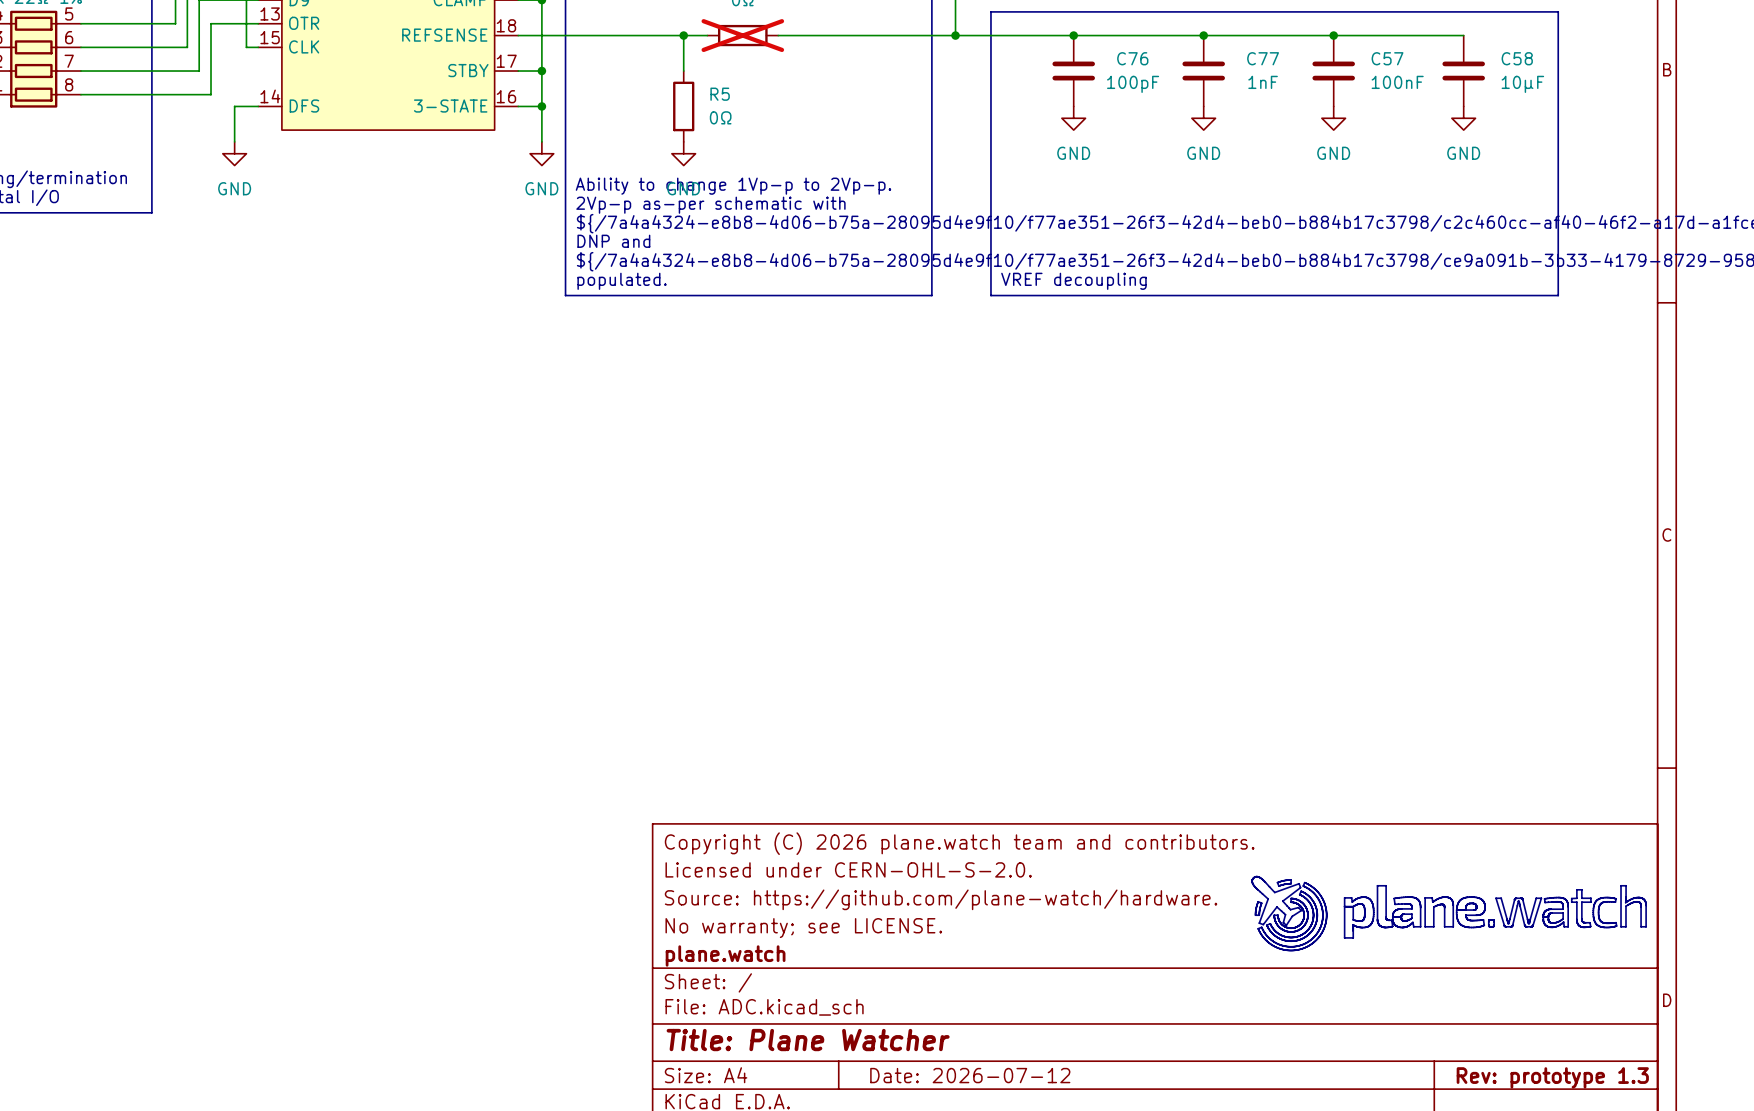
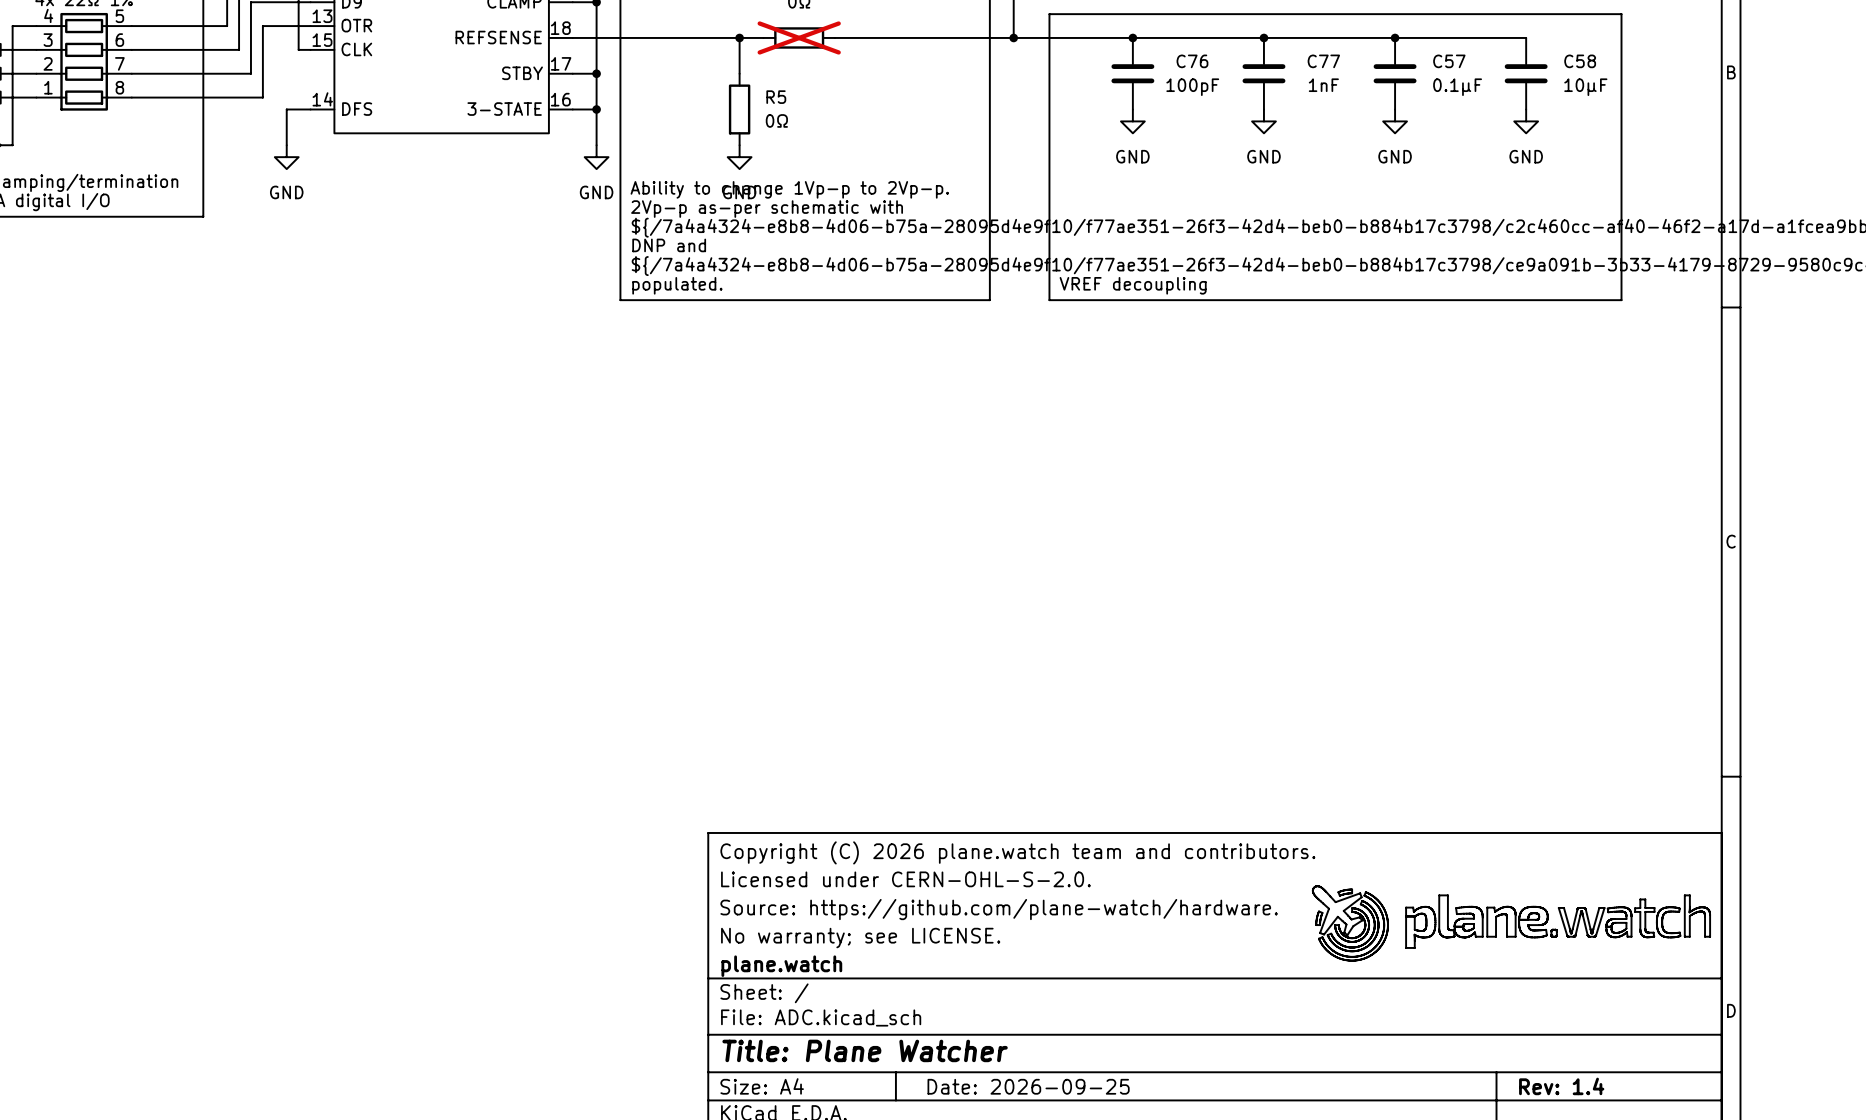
C57 value: 100nF (1397, 82) -> 0.1µF (1457, 87)
title block: Date: 2026-07-12 (970, 1075) -> Date: 2026-09-25 (1028, 1086)
title block: Rev: prototype 1.3 (1552, 1077) -> Rev: 1.4 (1561, 1086)

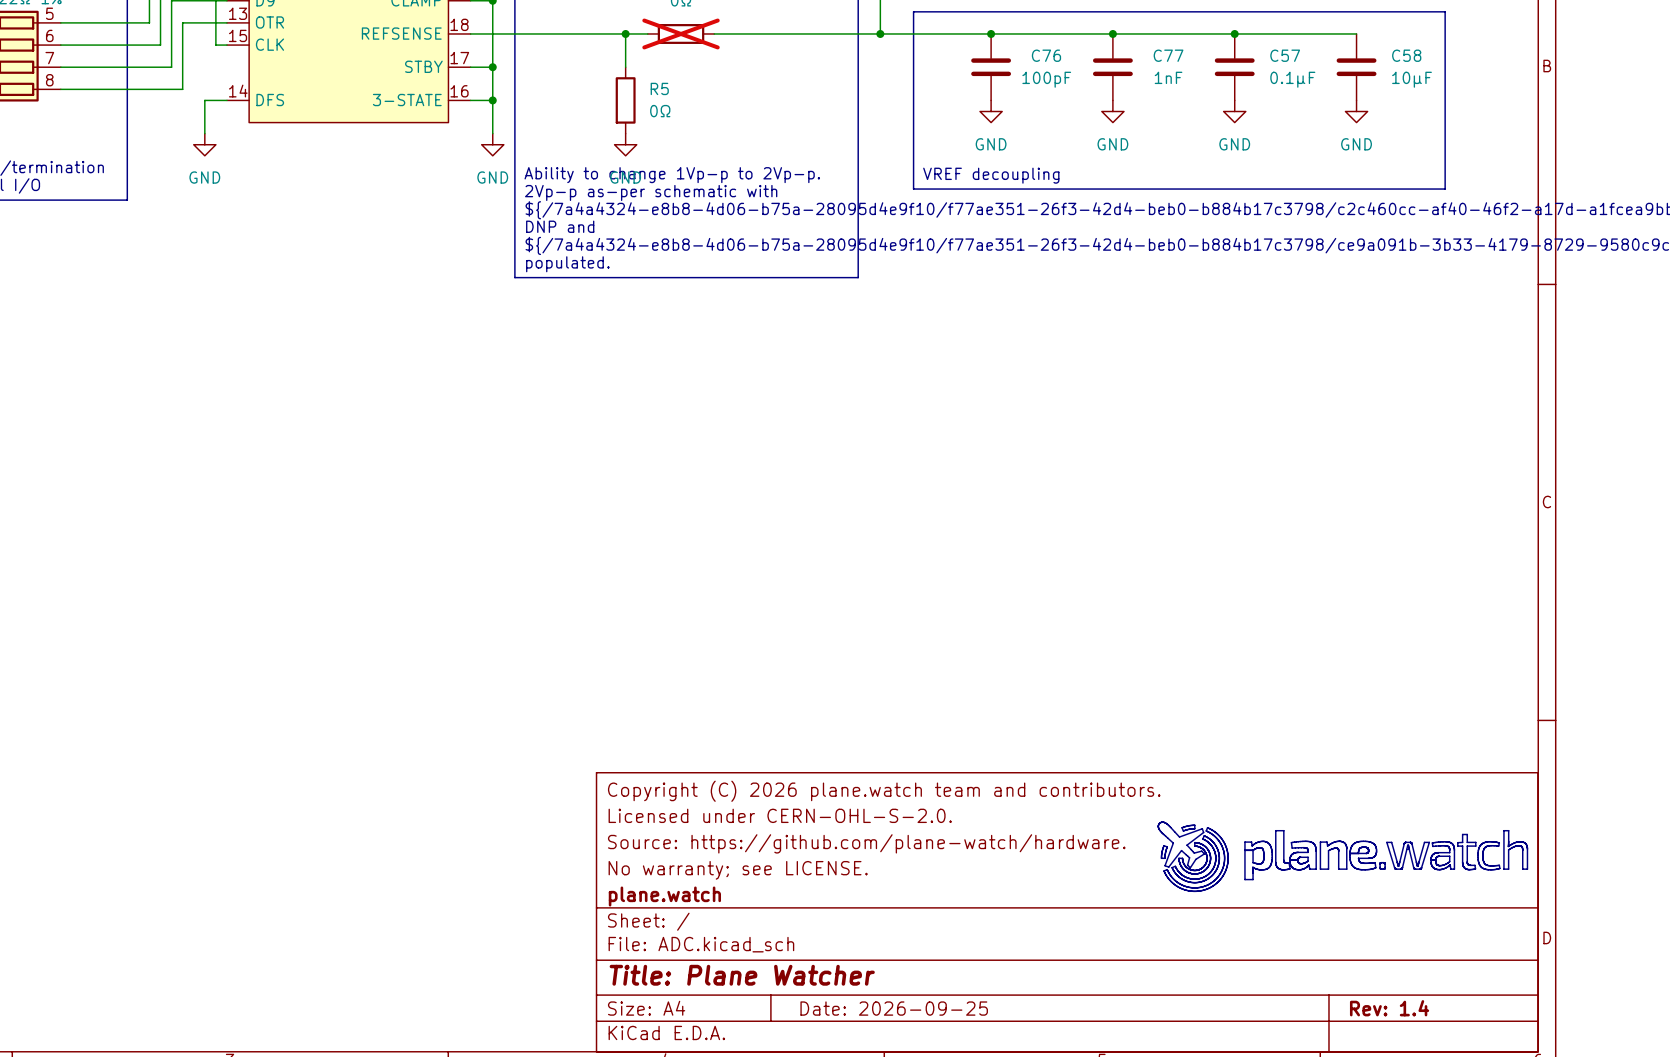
line: (1049, 204) (1049, 300) (1621, 300) (1621, 204) -> (913, 189) (1445, 189)
text position: VREF decoupling (1133, 285) -> VREF decoupling (991, 175)

